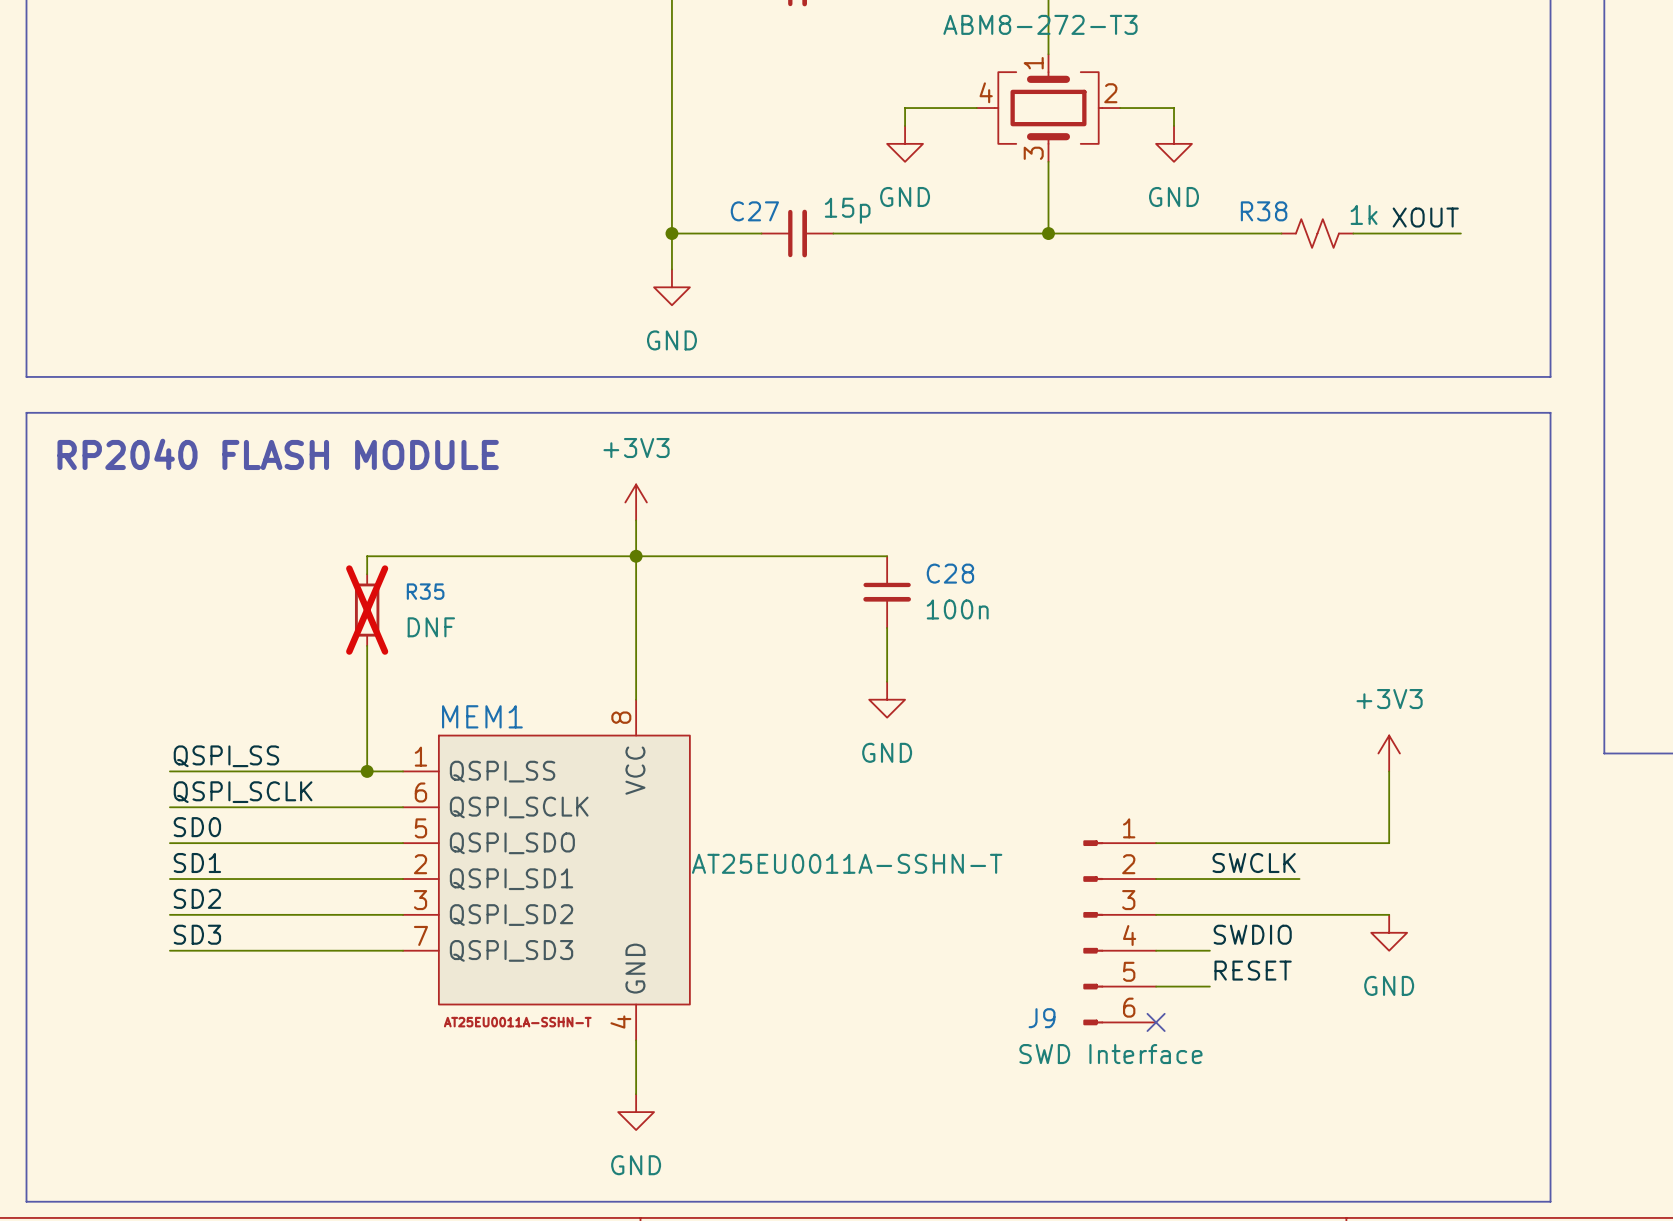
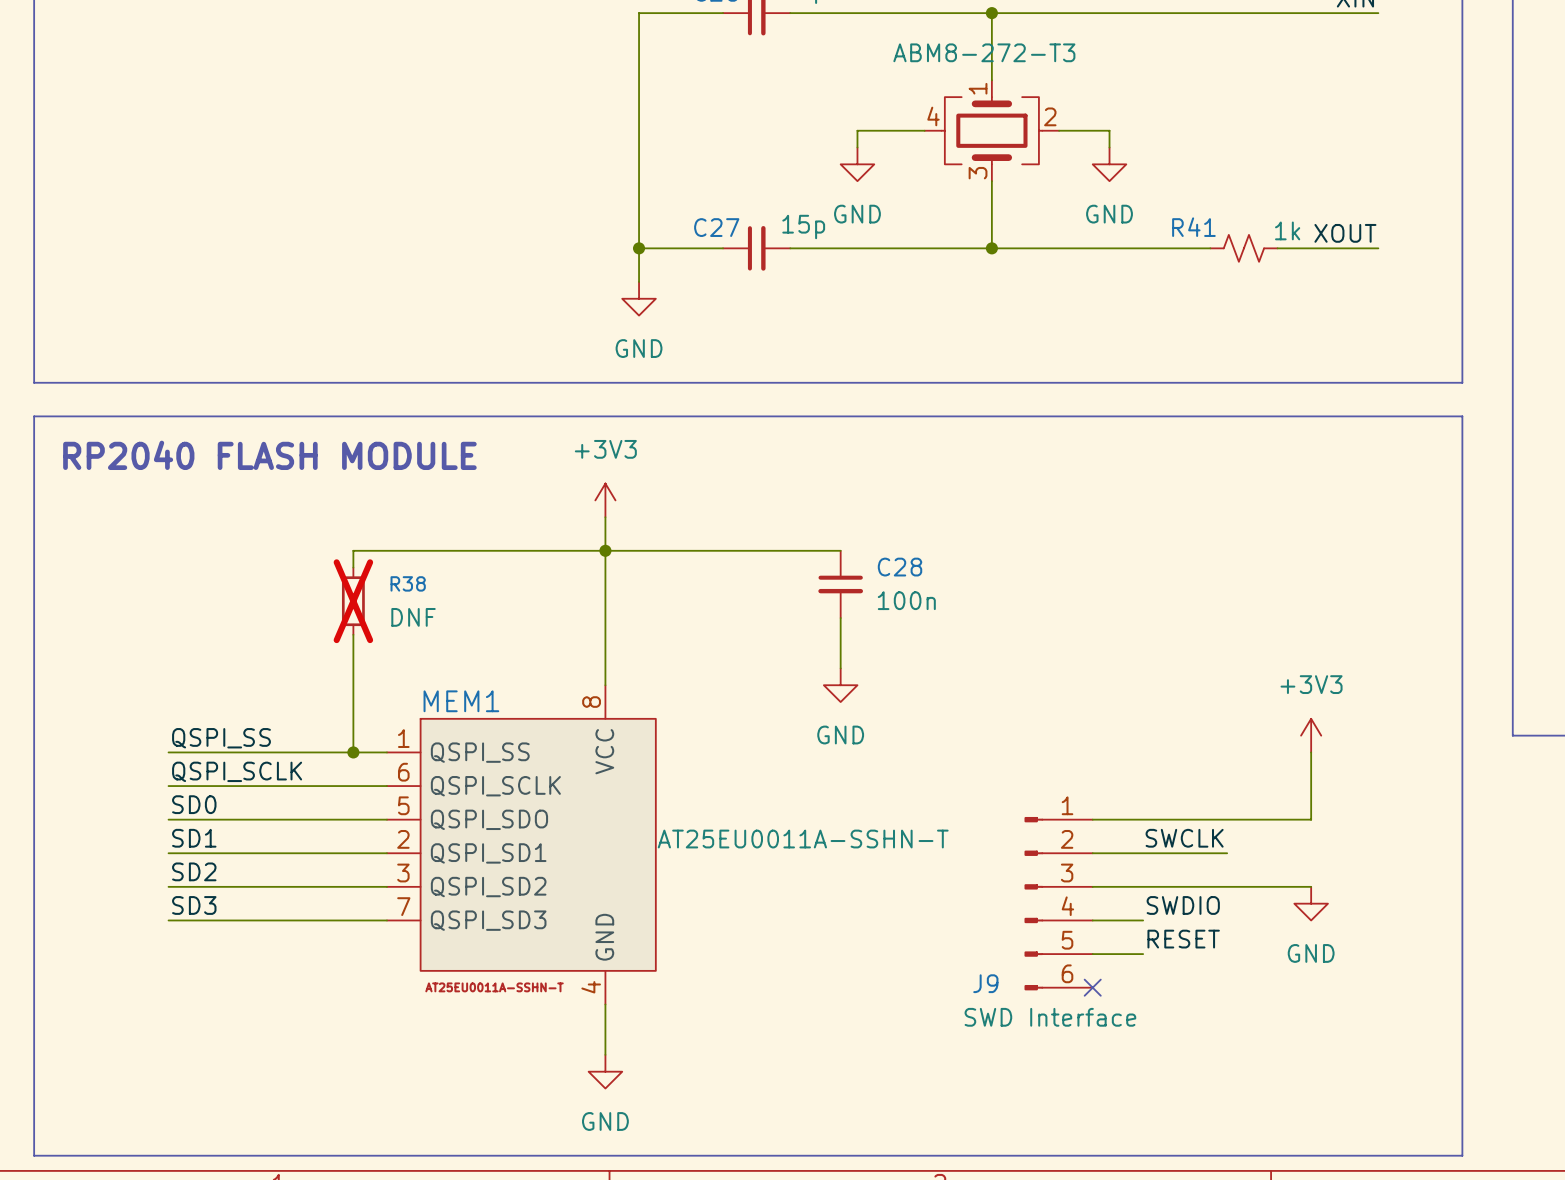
R38 name: R38 (1264, 211) -> R41 (1193, 227)
R35 name: R35 (425, 591) -> R38 (408, 583)

